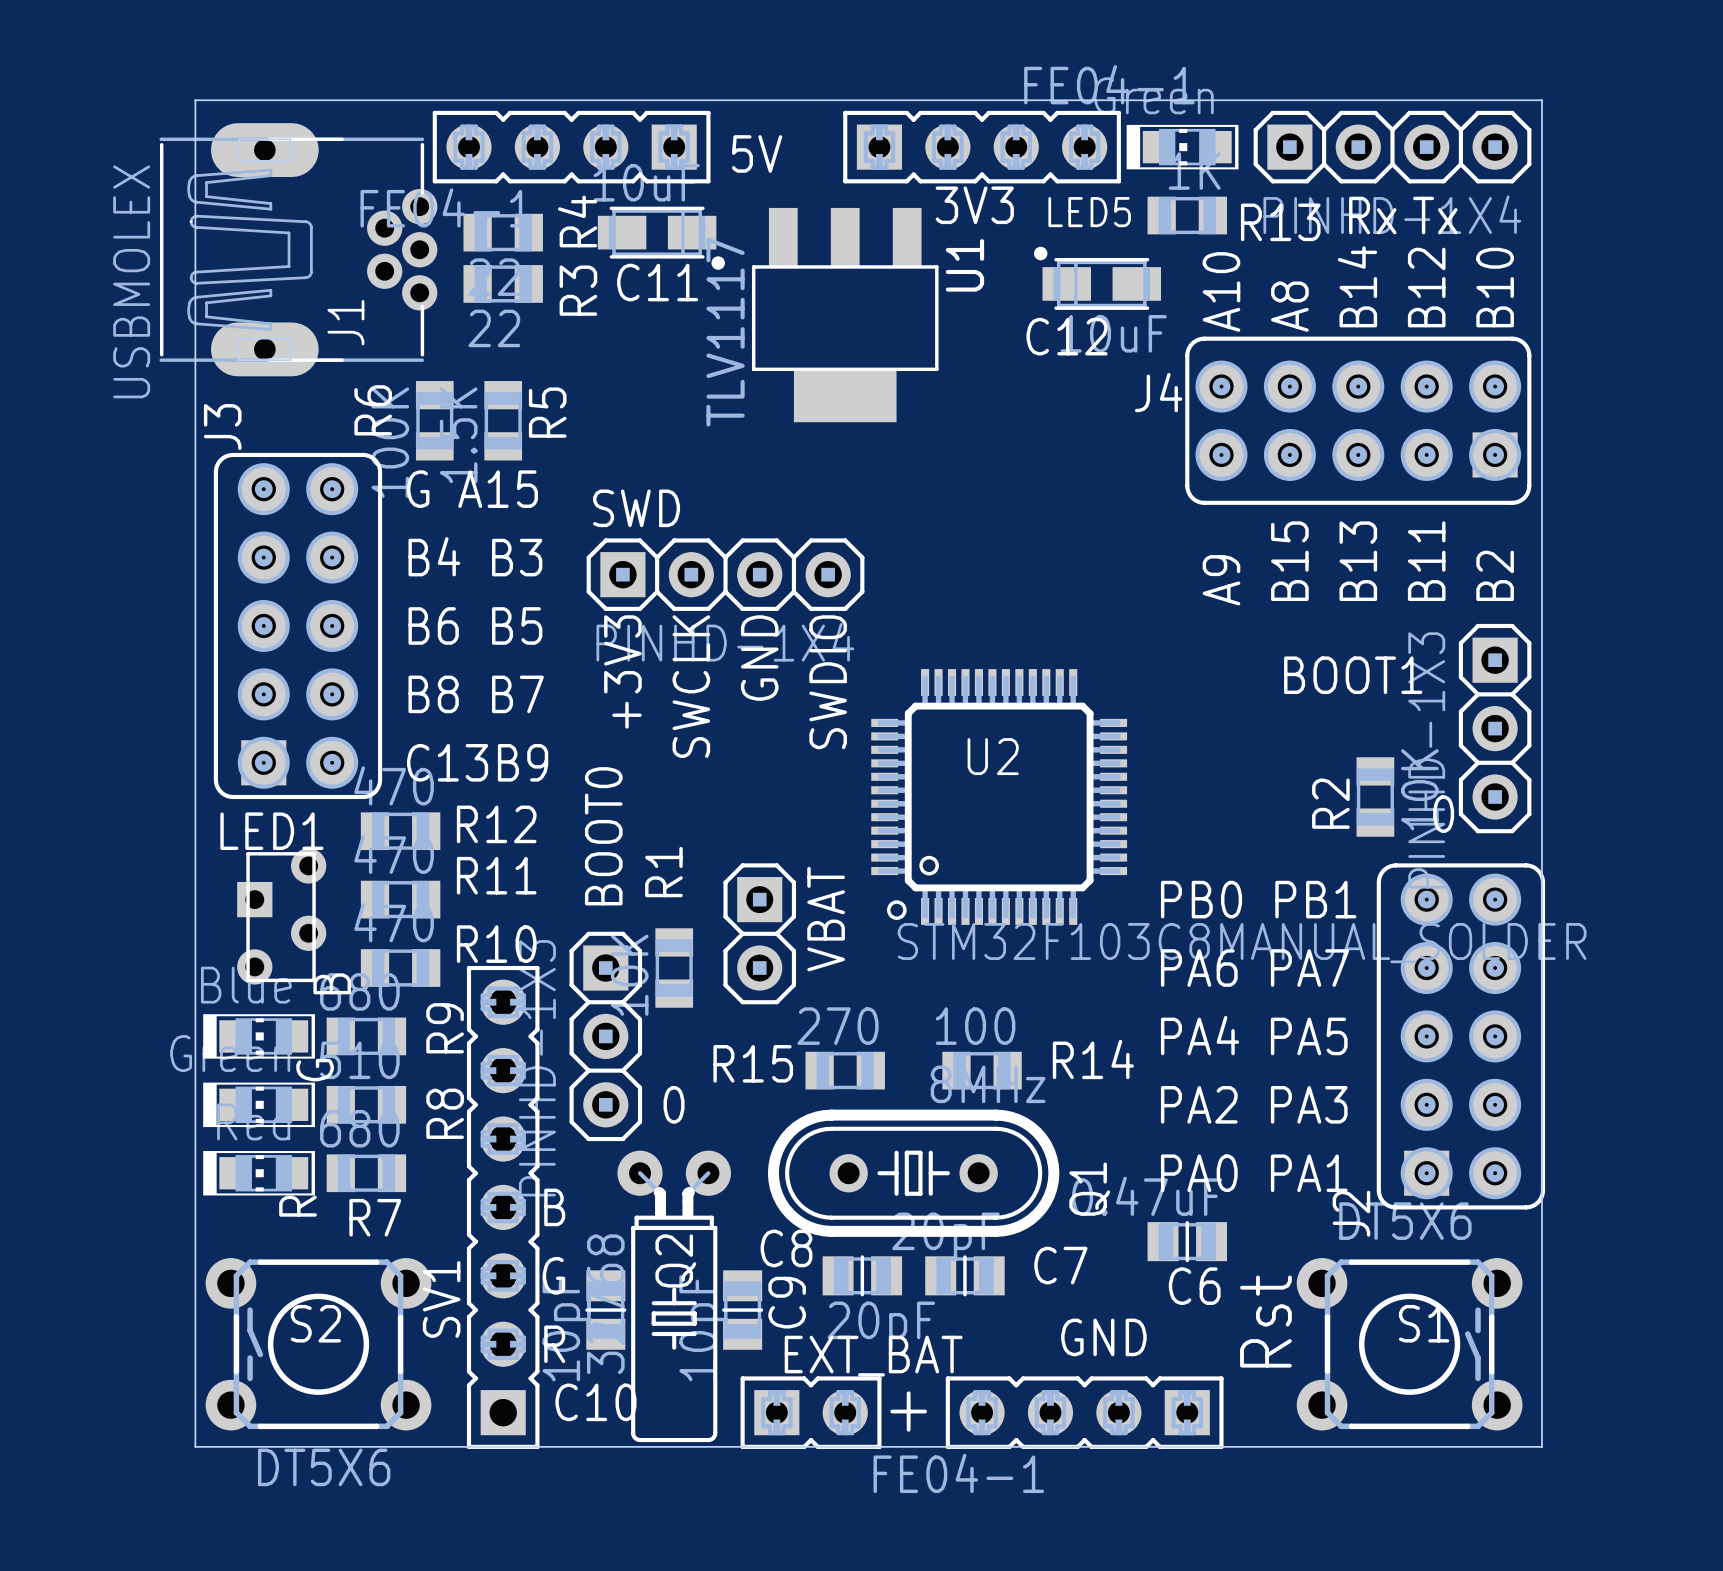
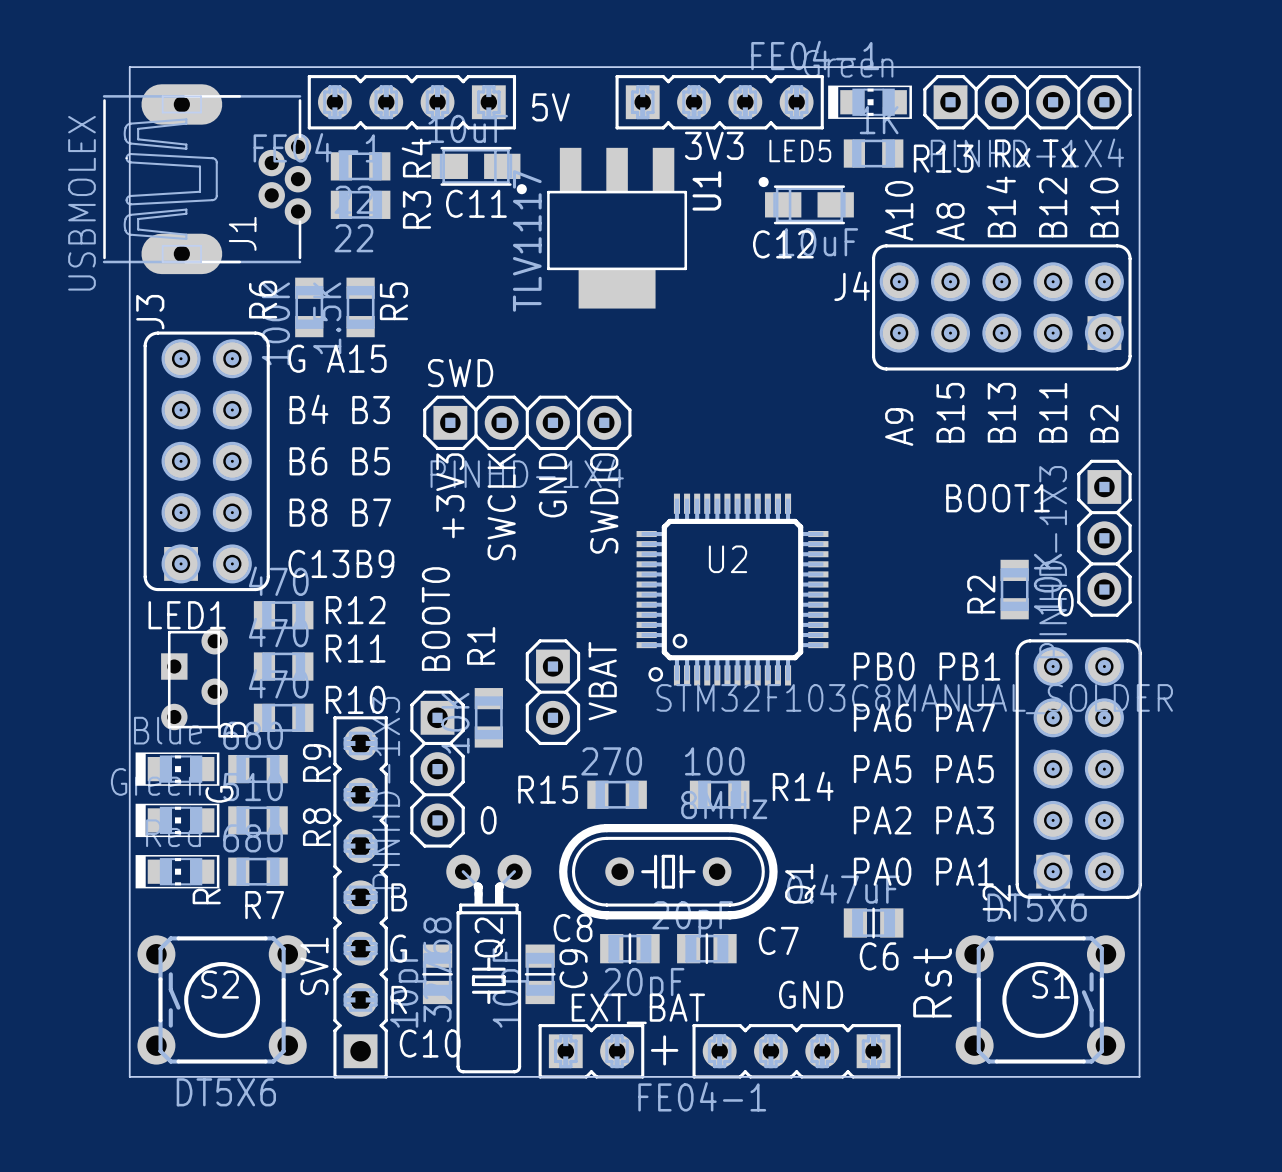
text: PA4 PA5 (1254, 1035) -> PA5 PA5 (923, 769)

